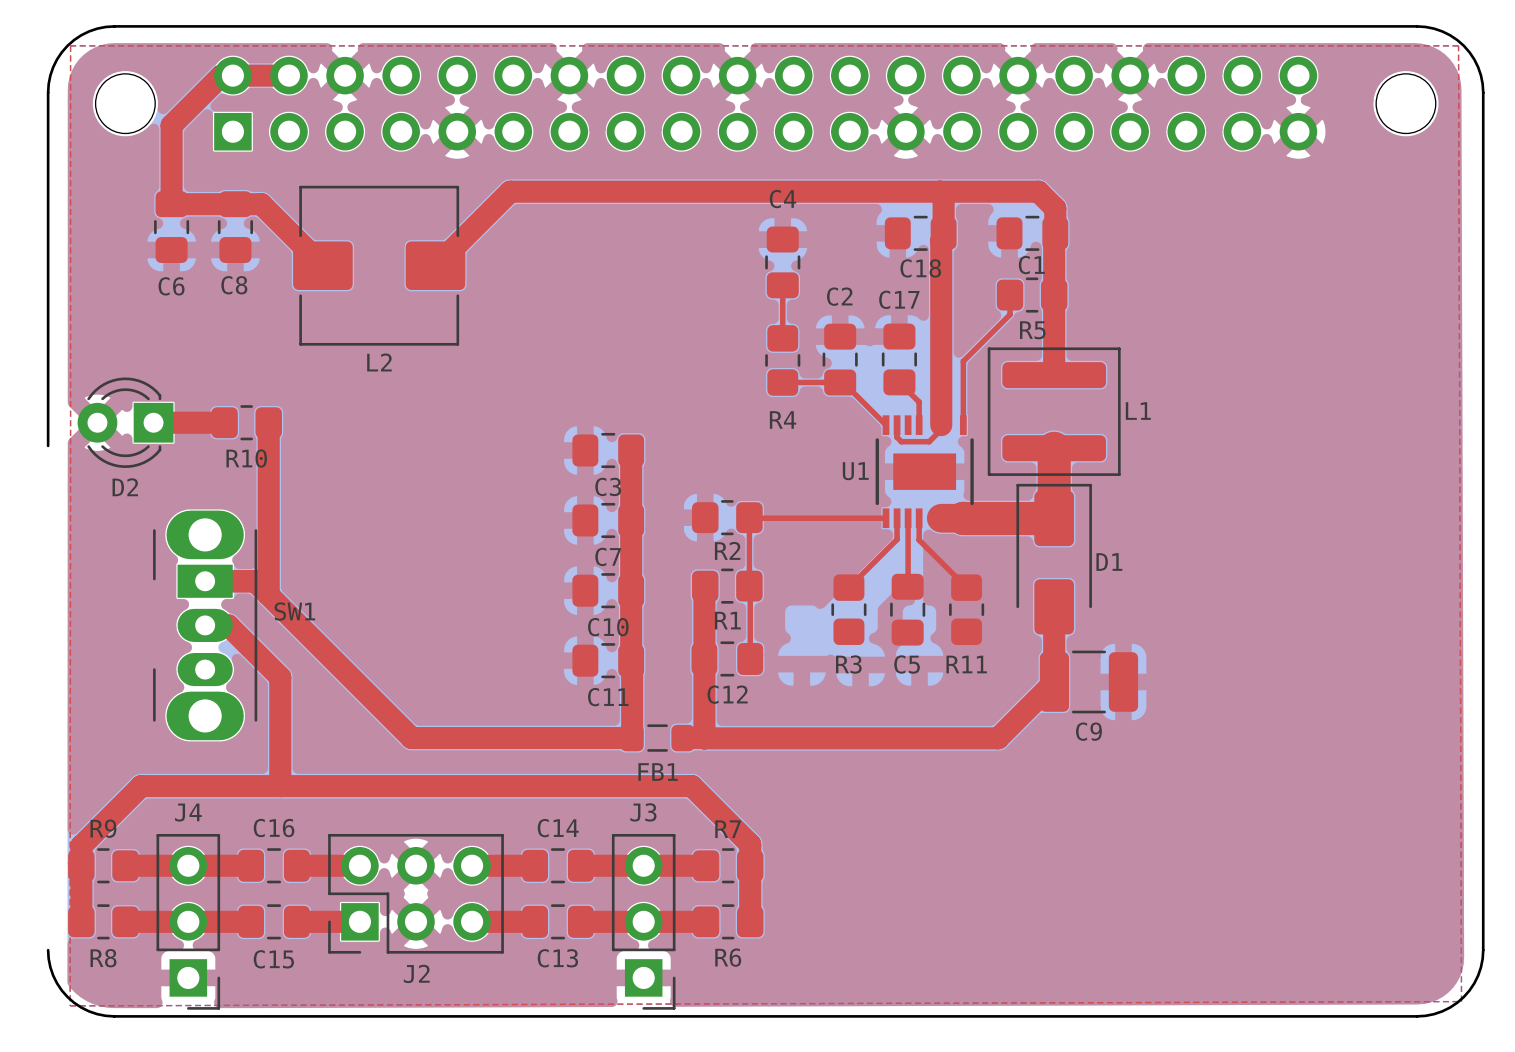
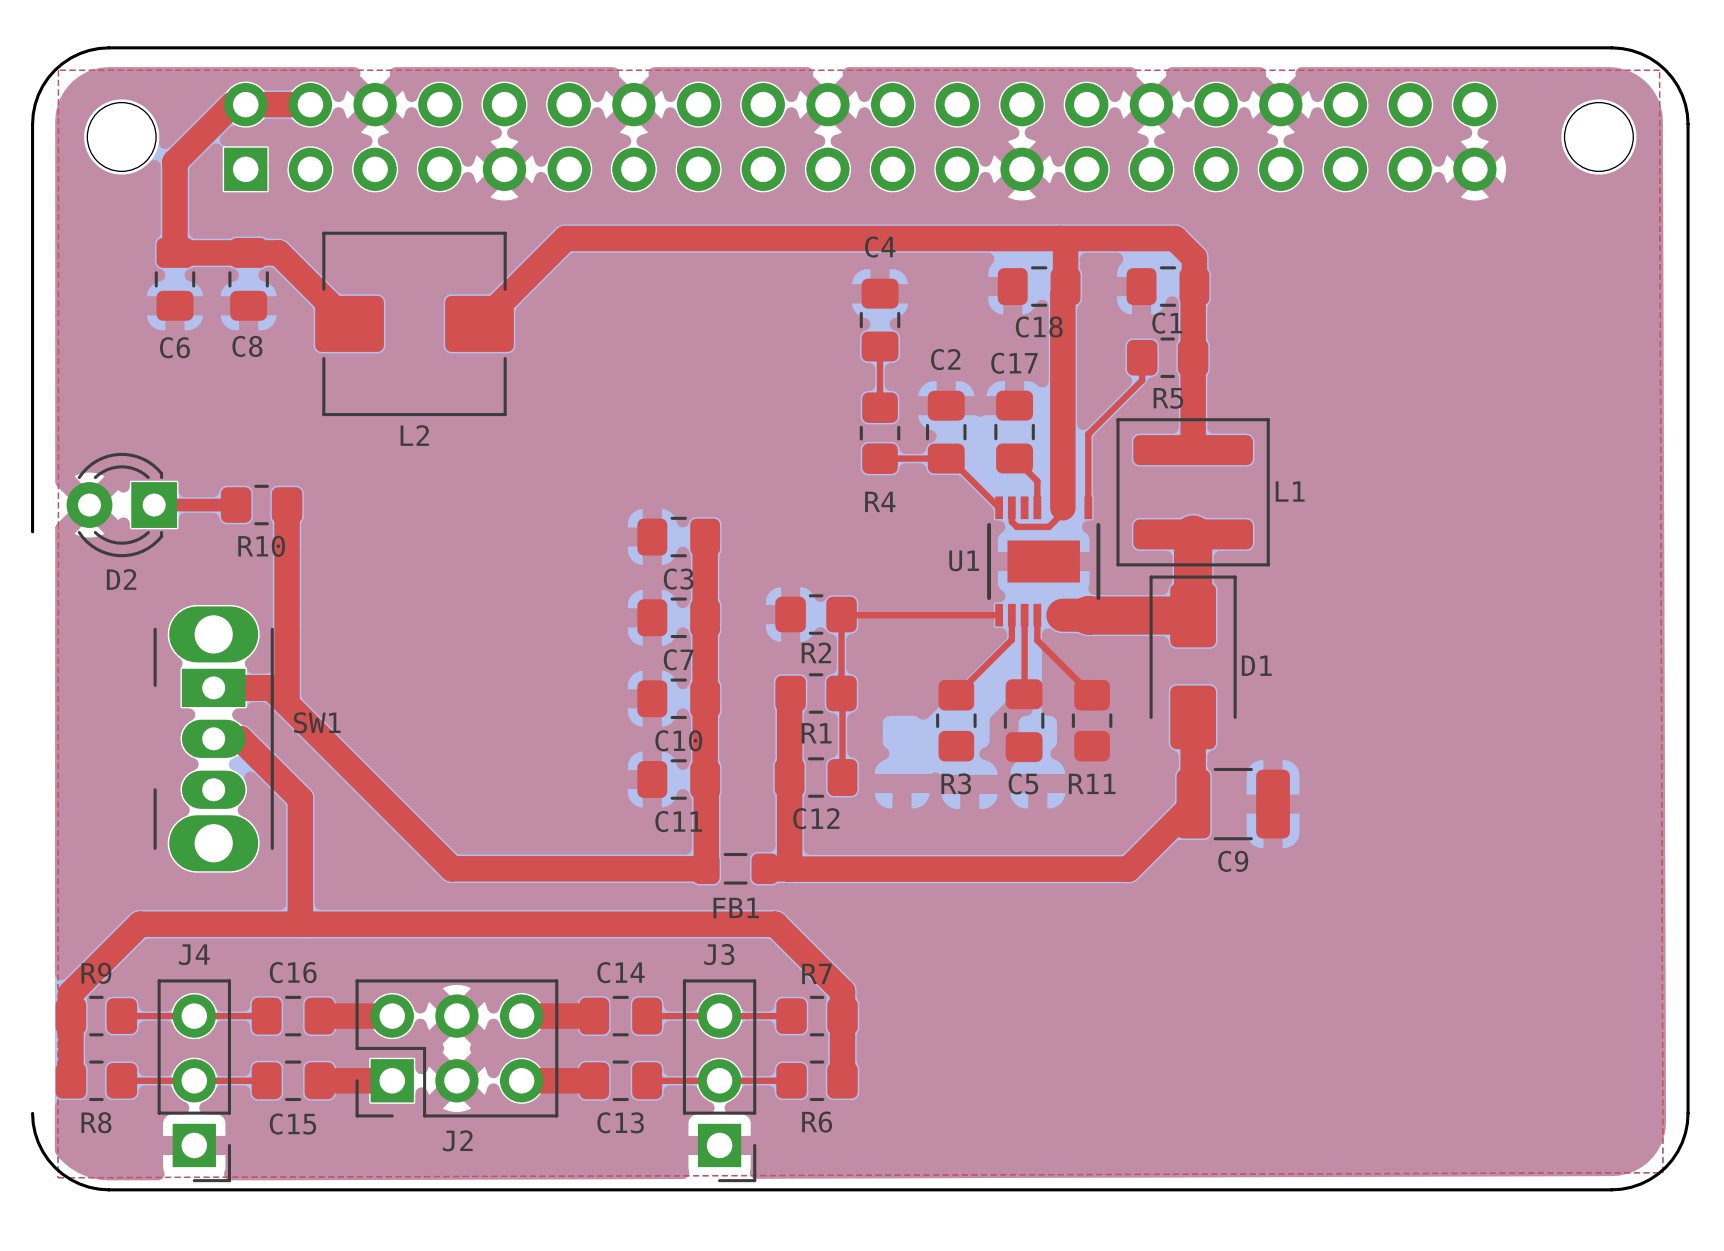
top track width: thick (153, 422) (224, 422) -> thin (154, 505) (236, 505)
top track width: thick (125, 865) (251, 865) -> thin (121, 1016) (266, 1016)
top track width: thick (580, 865) (706, 865) -> thin (647, 1016) (791, 1016)
top track width: thick (125, 921) (251, 921) -> thin (121, 1080) (266, 1080)
top track width: thick (580, 921) (706, 921) -> thin (647, 1080) (791, 1080)

